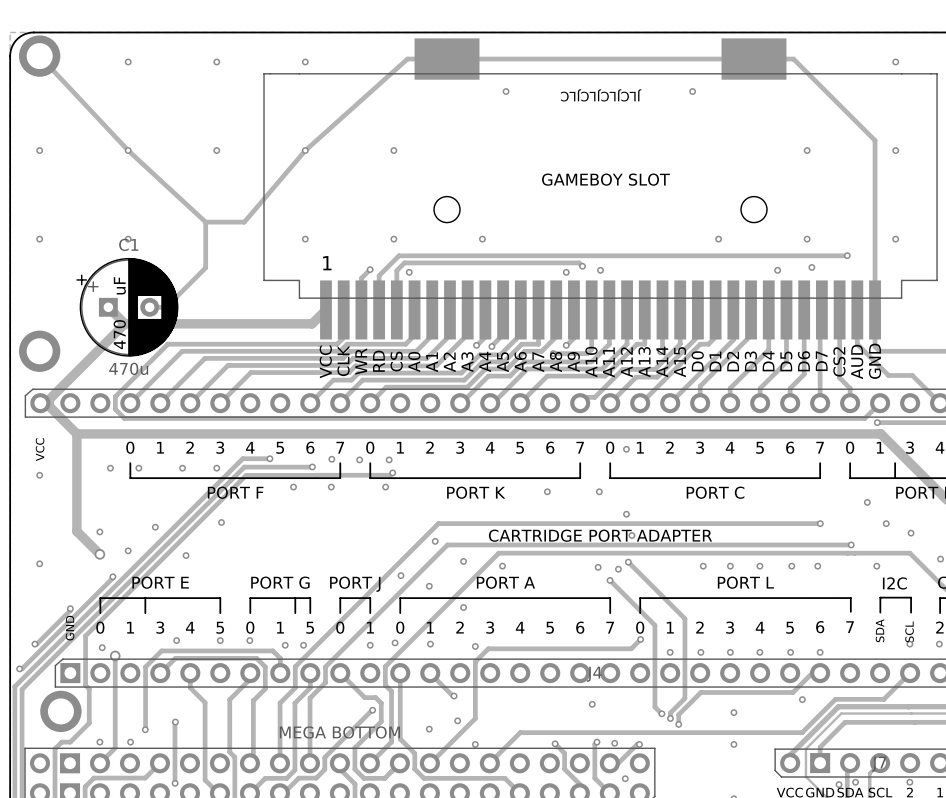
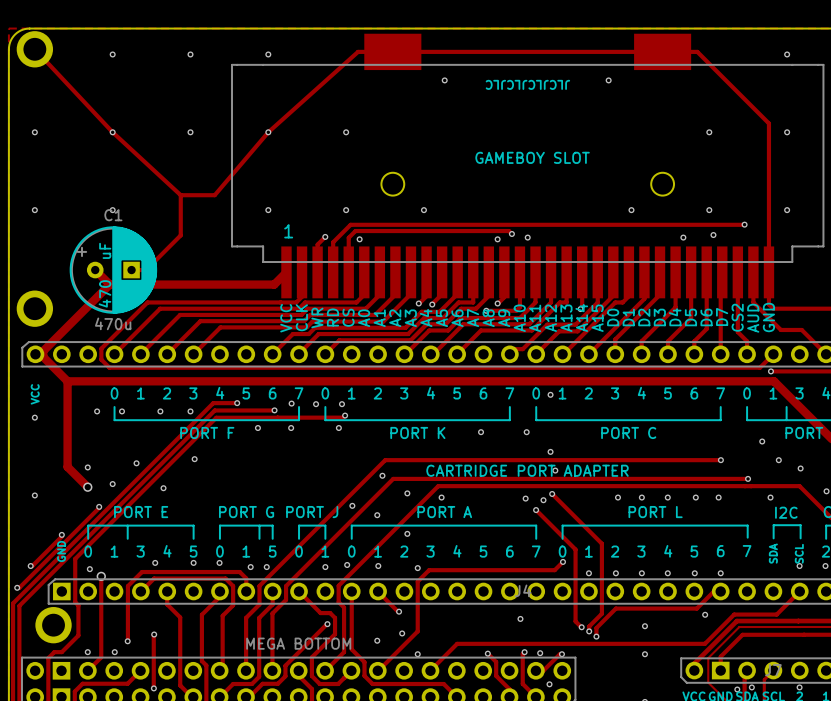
C1 footprint: [76, 257, 179, 357] -> [70, 226, 157, 314]

